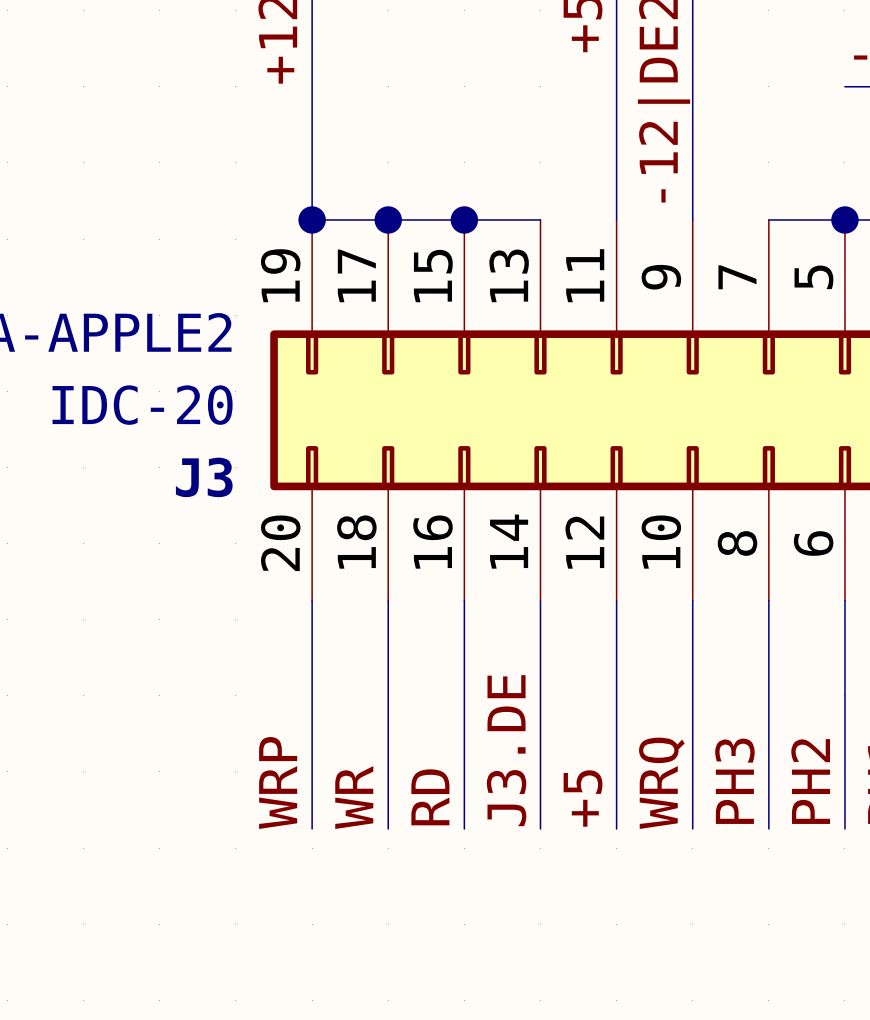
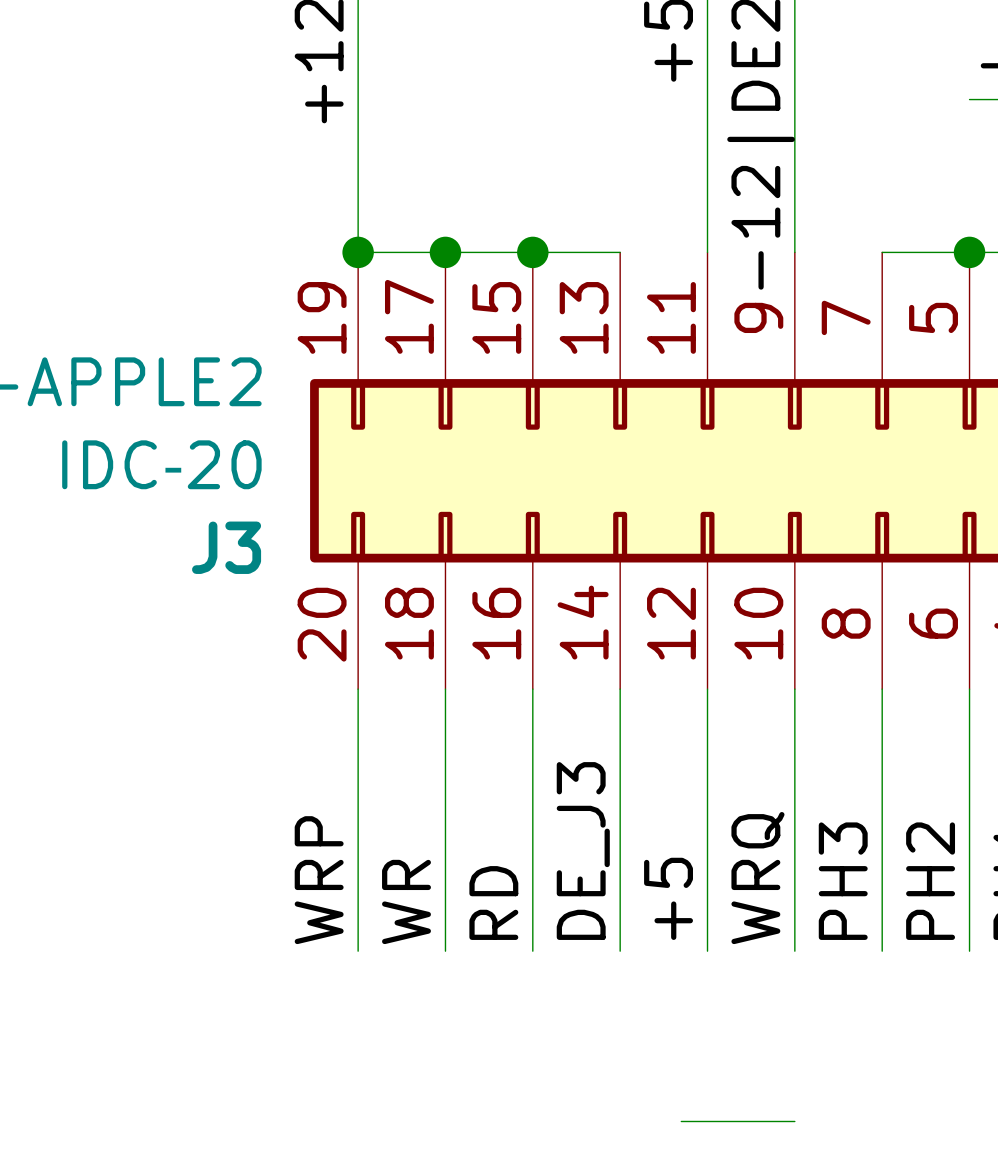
label: J3.DE (506, 750) -> DE_J3 (583, 851)
wire: none -> (681, 1121) (794, 1121)

